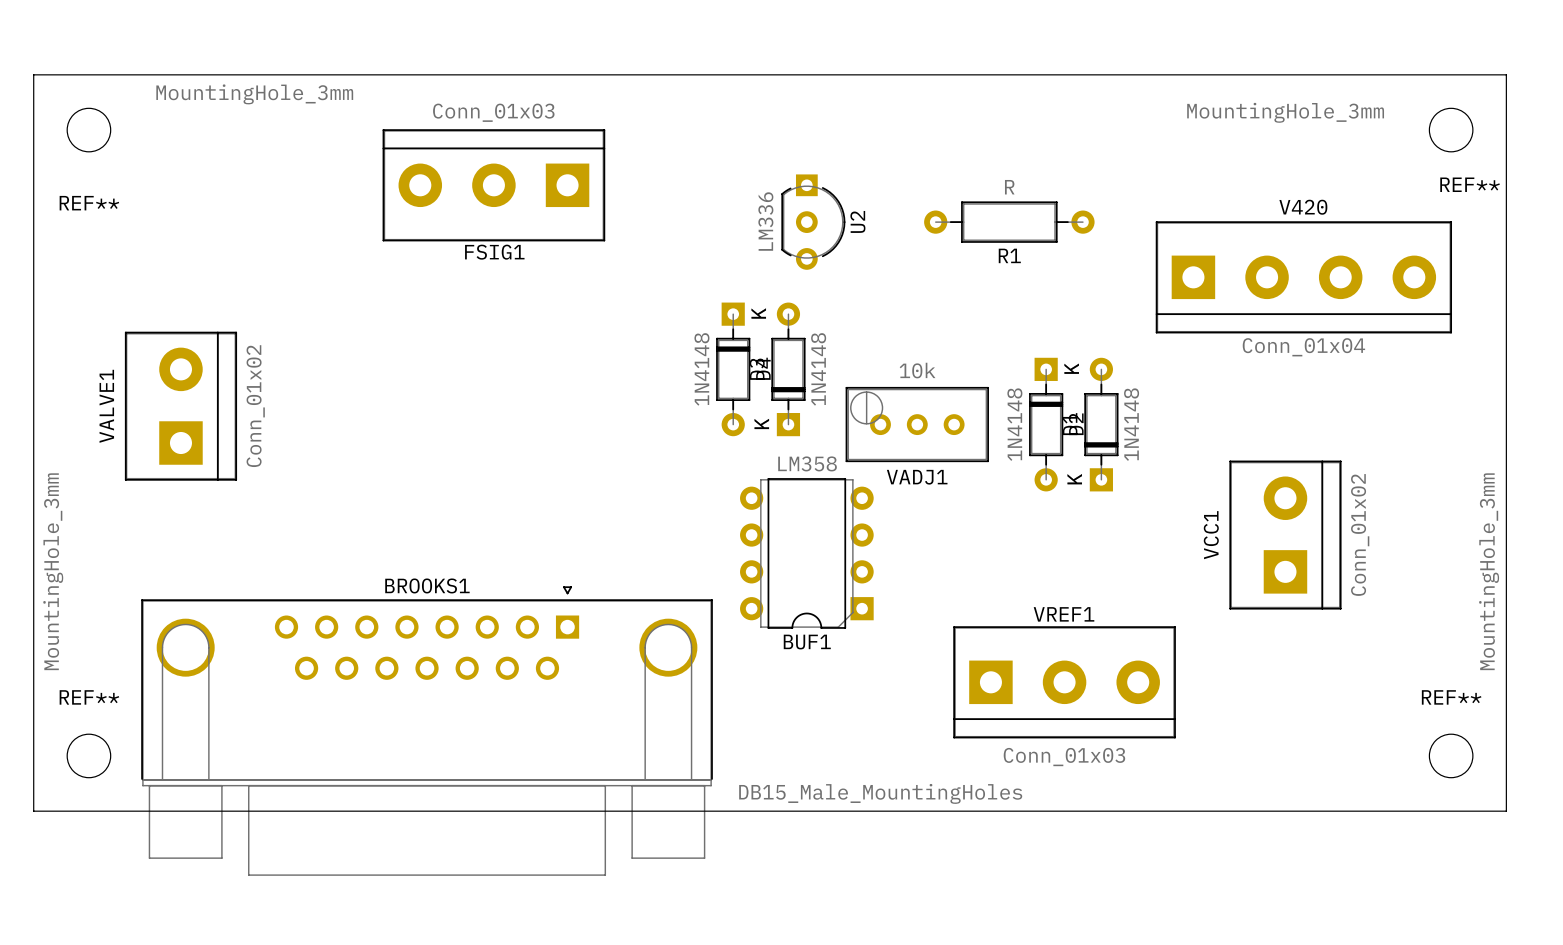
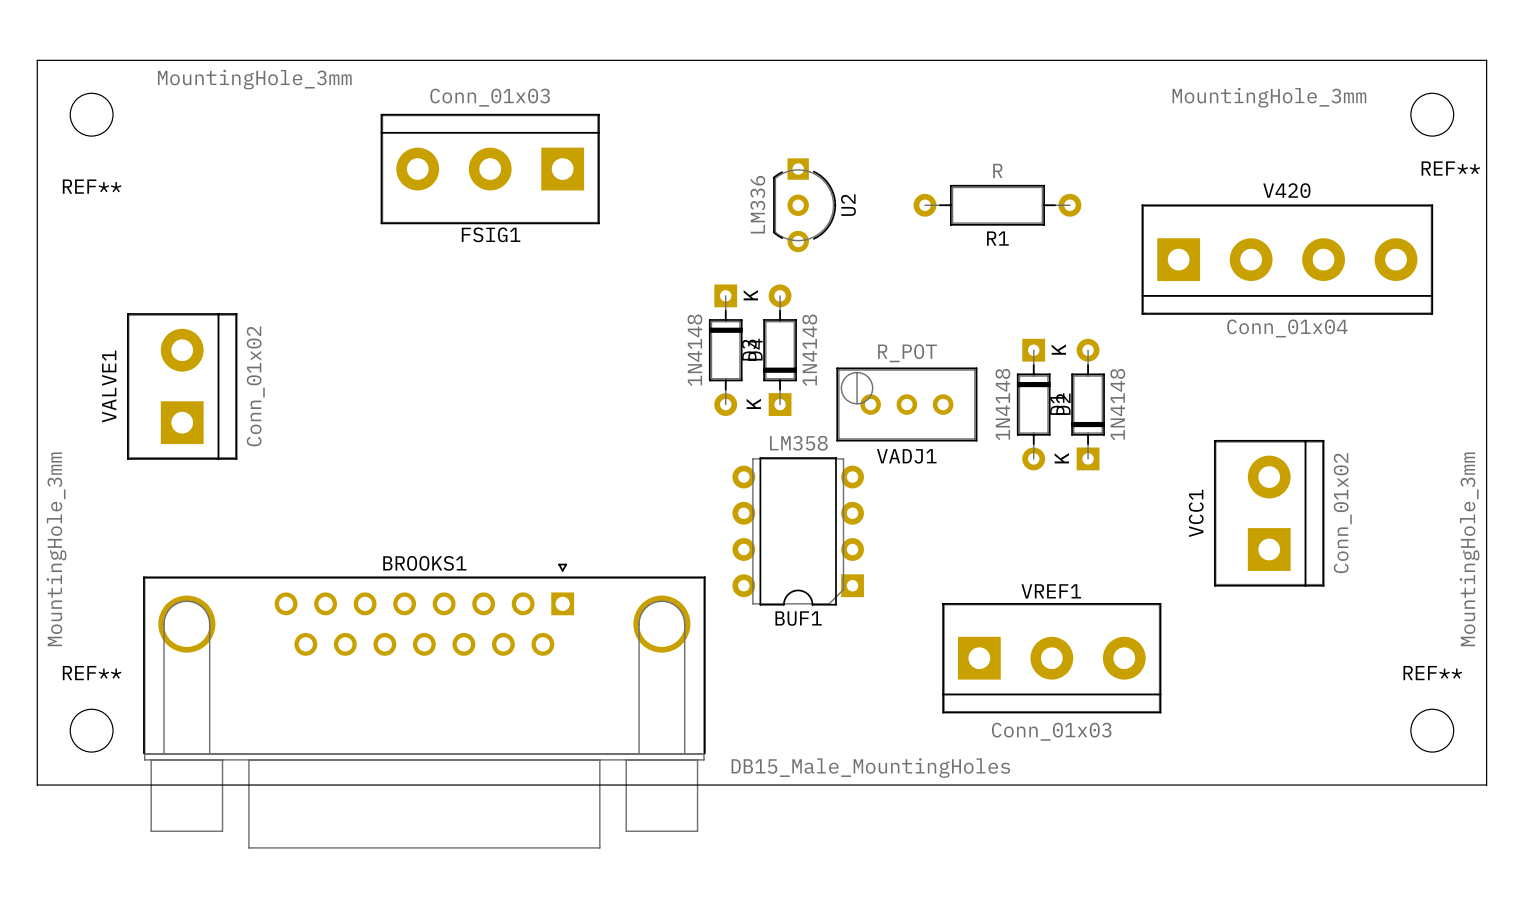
VADJ1 value: 10k (917, 370) -> R_POT (907, 353)

